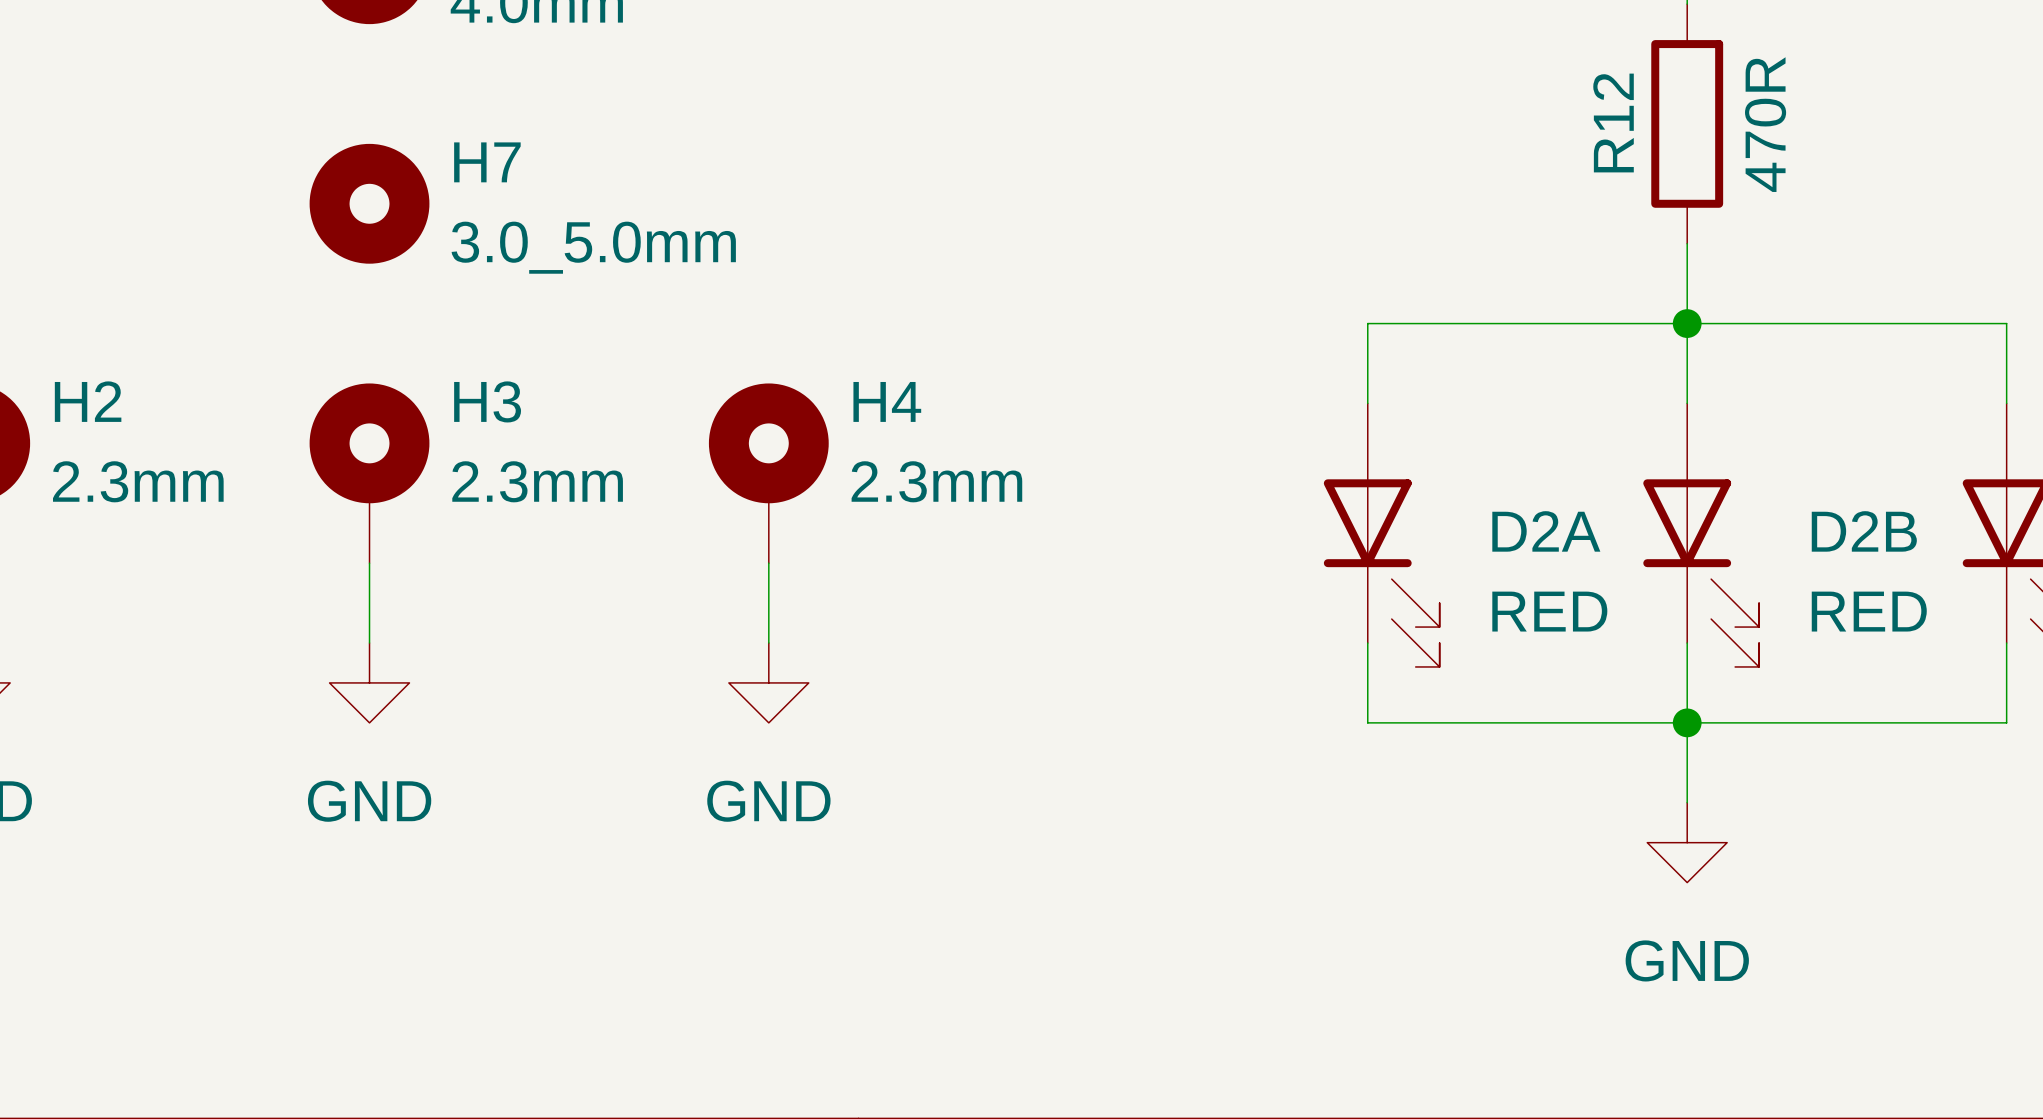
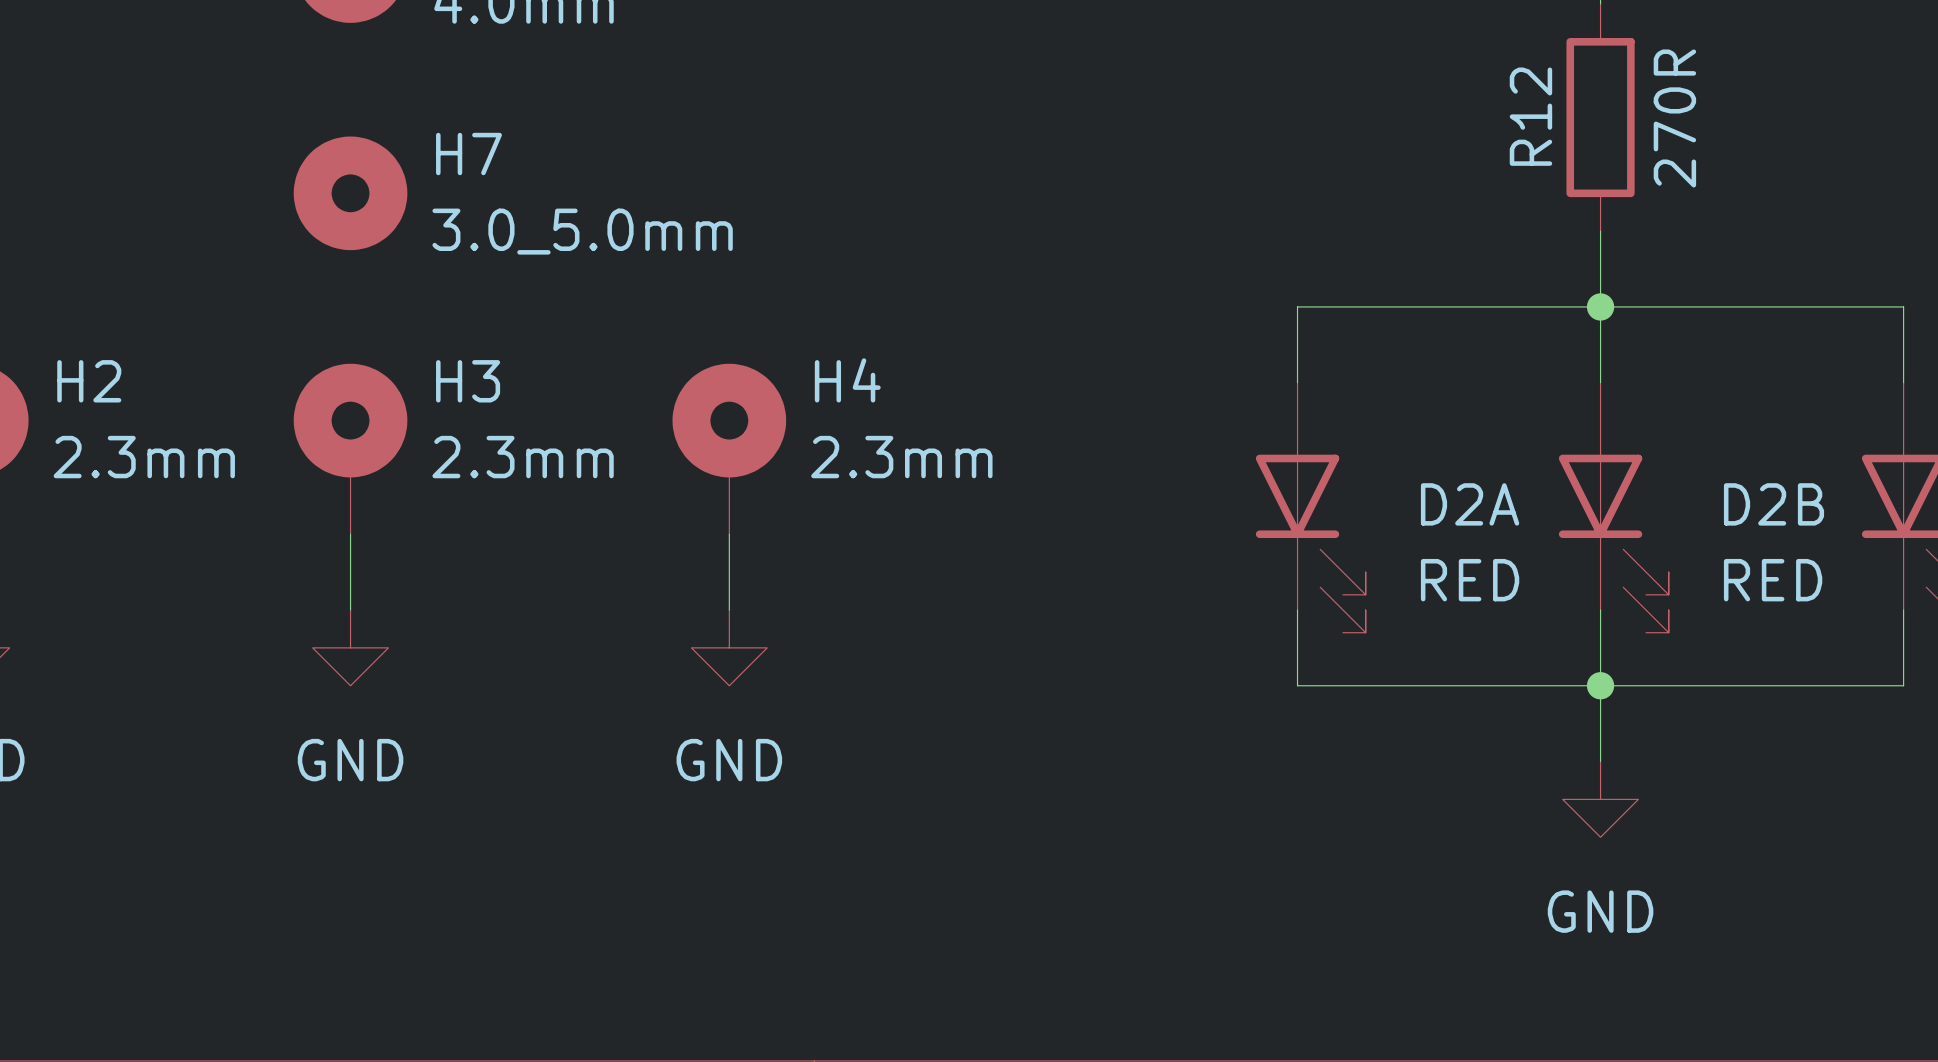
R12 value: 470R (1765, 124) -> 270R (1674, 118)

